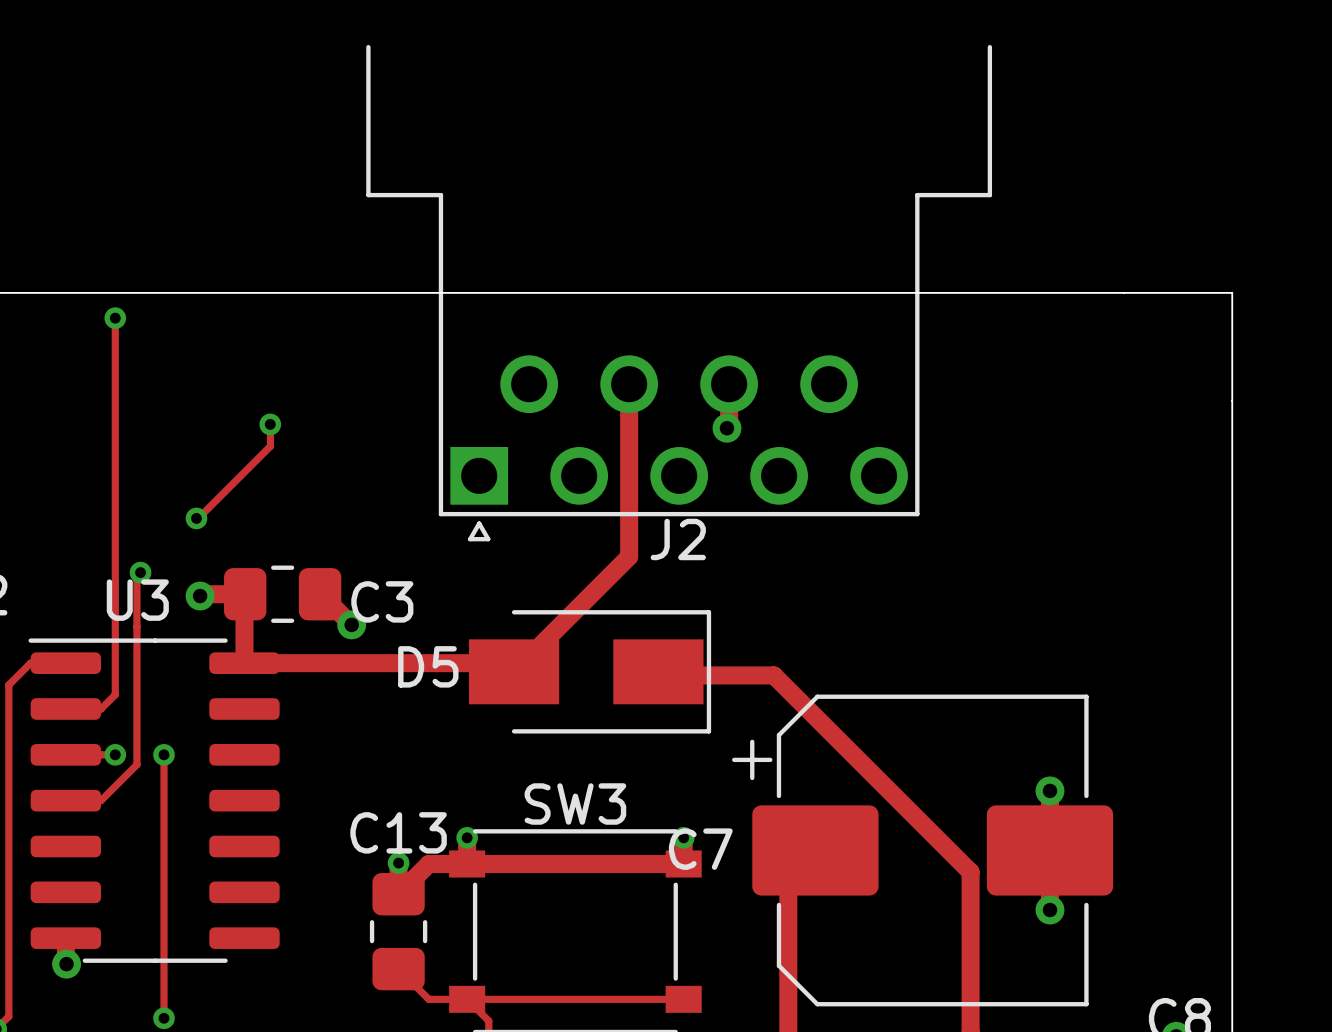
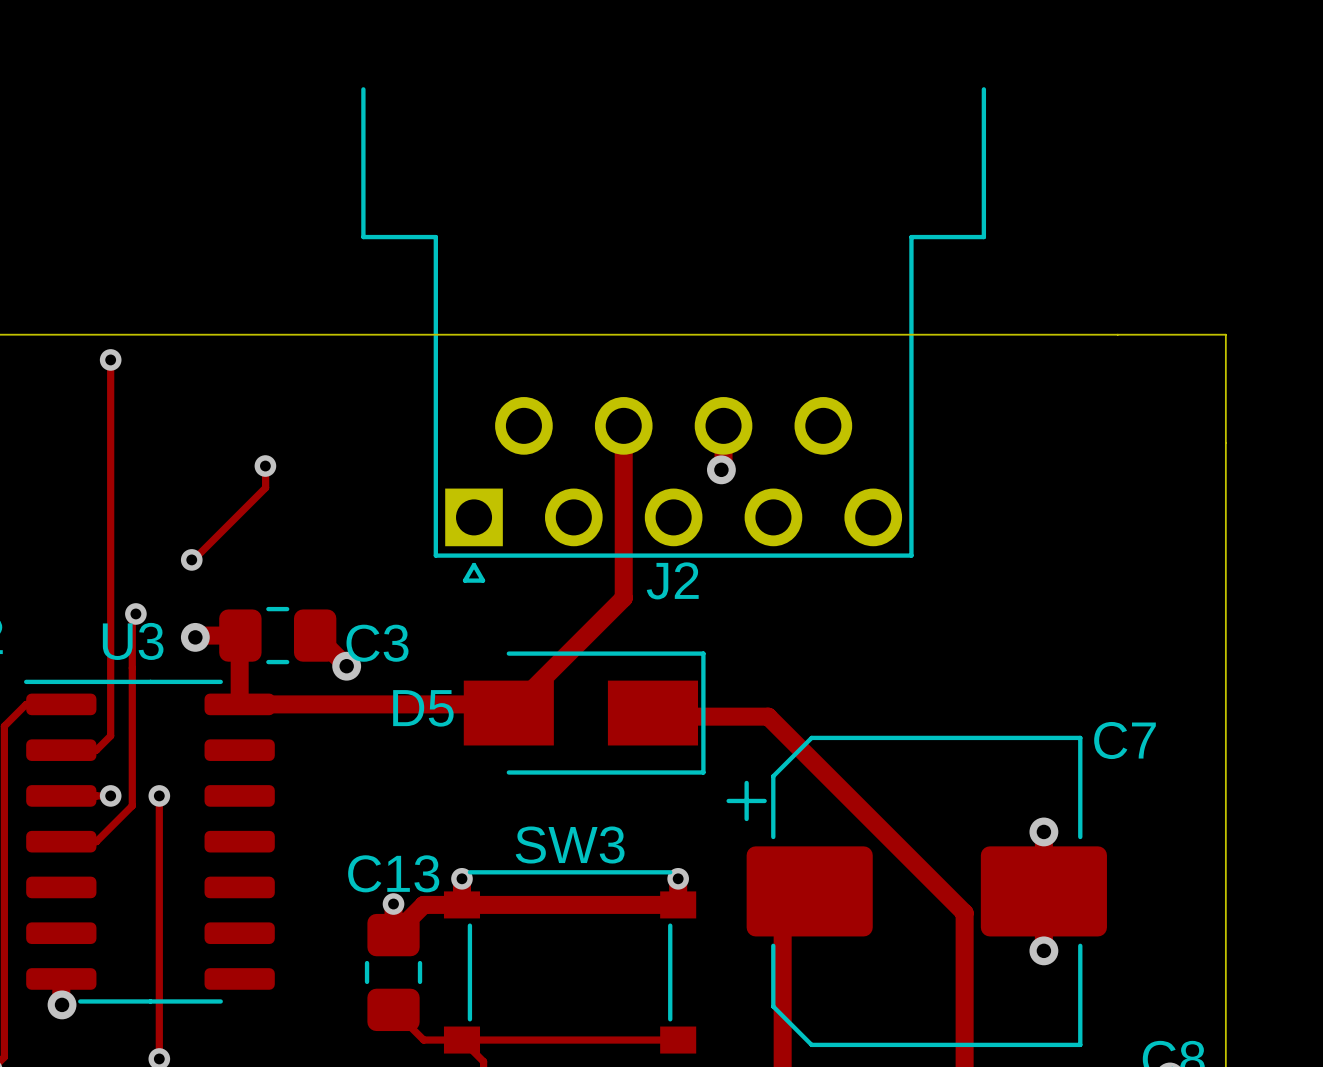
C7 name position: C7 (700, 849) -> C7 (1124, 740)

